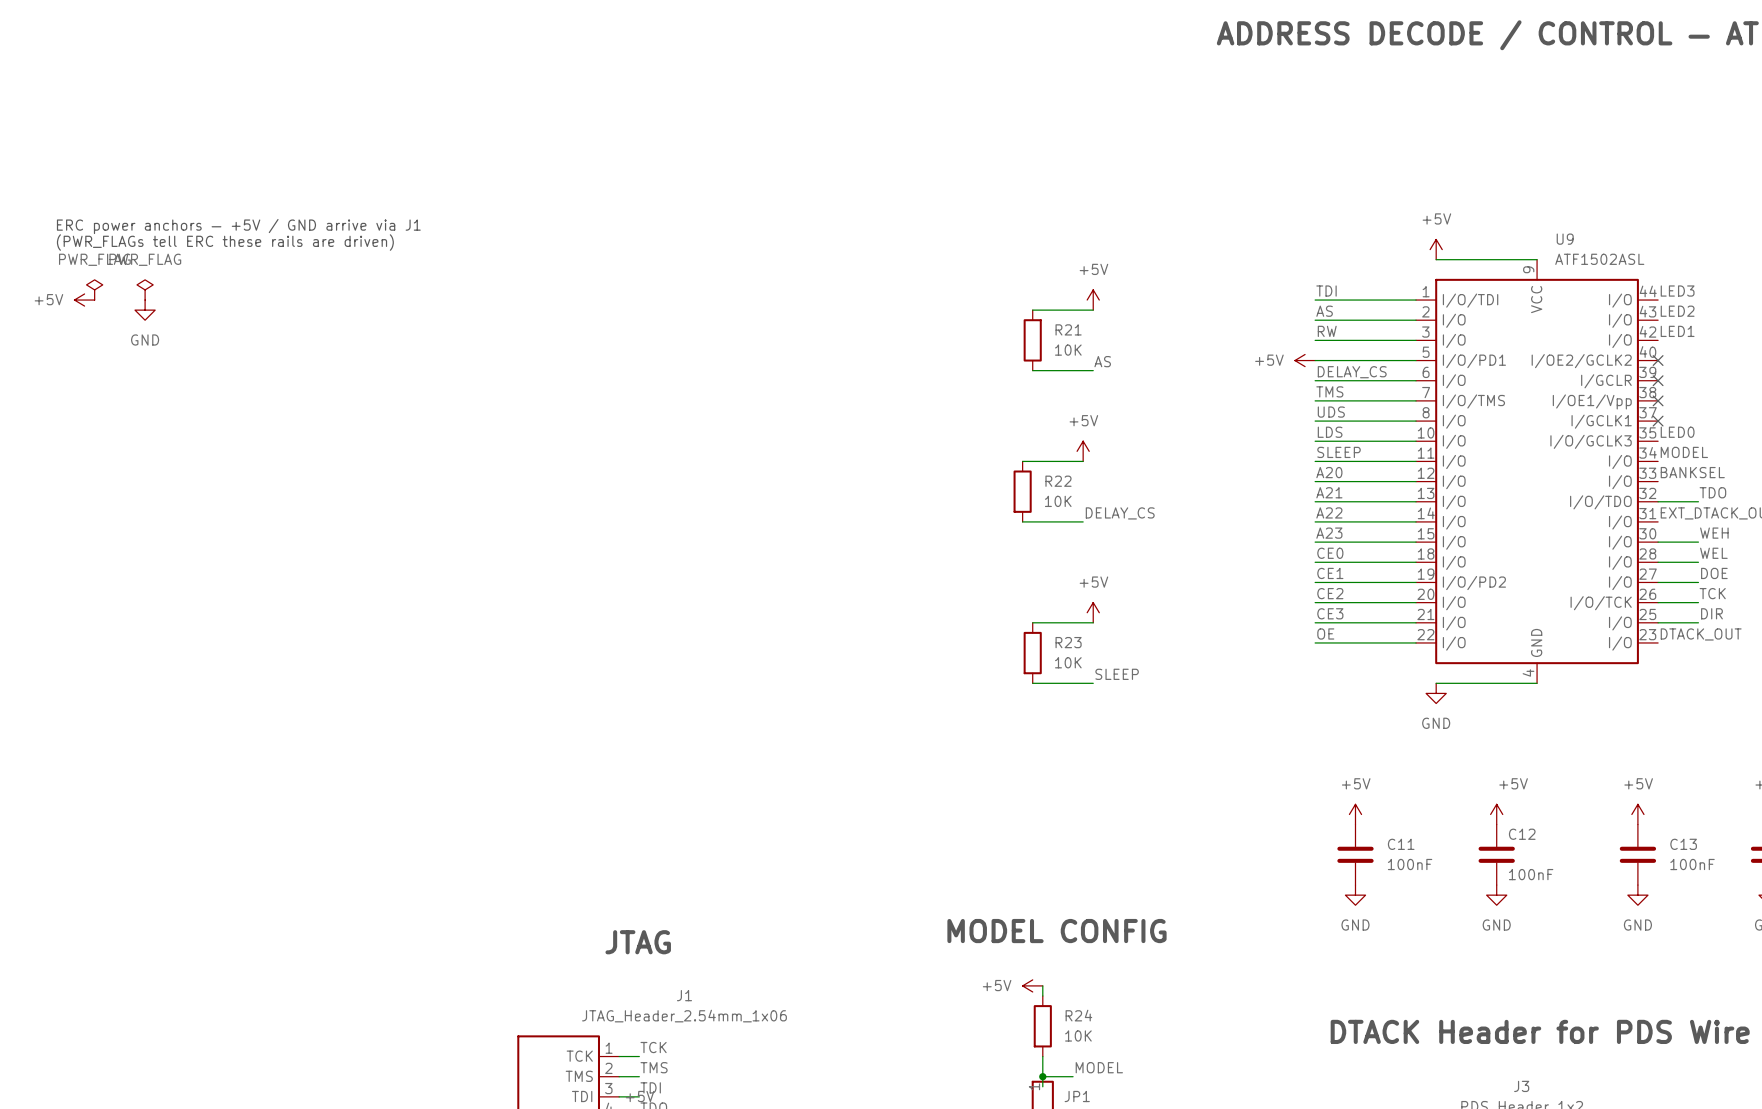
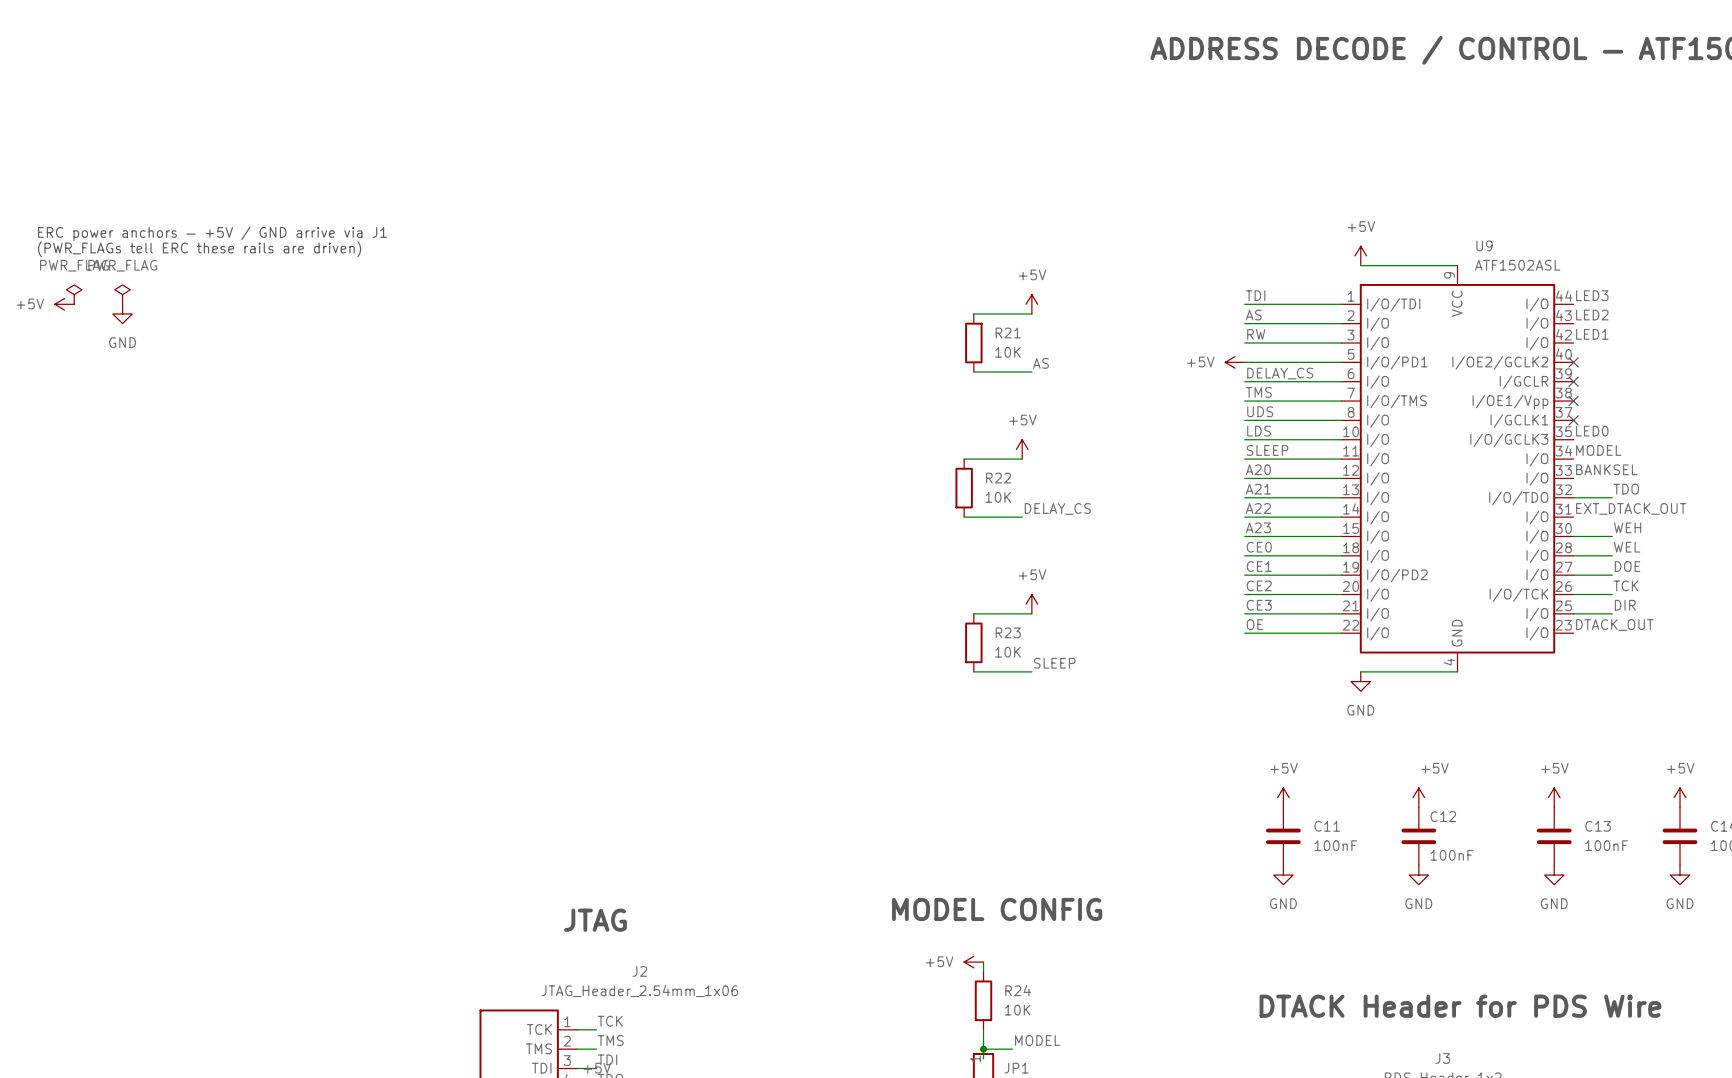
J1 name: J1 (684, 995) -> J2 (639, 971)

